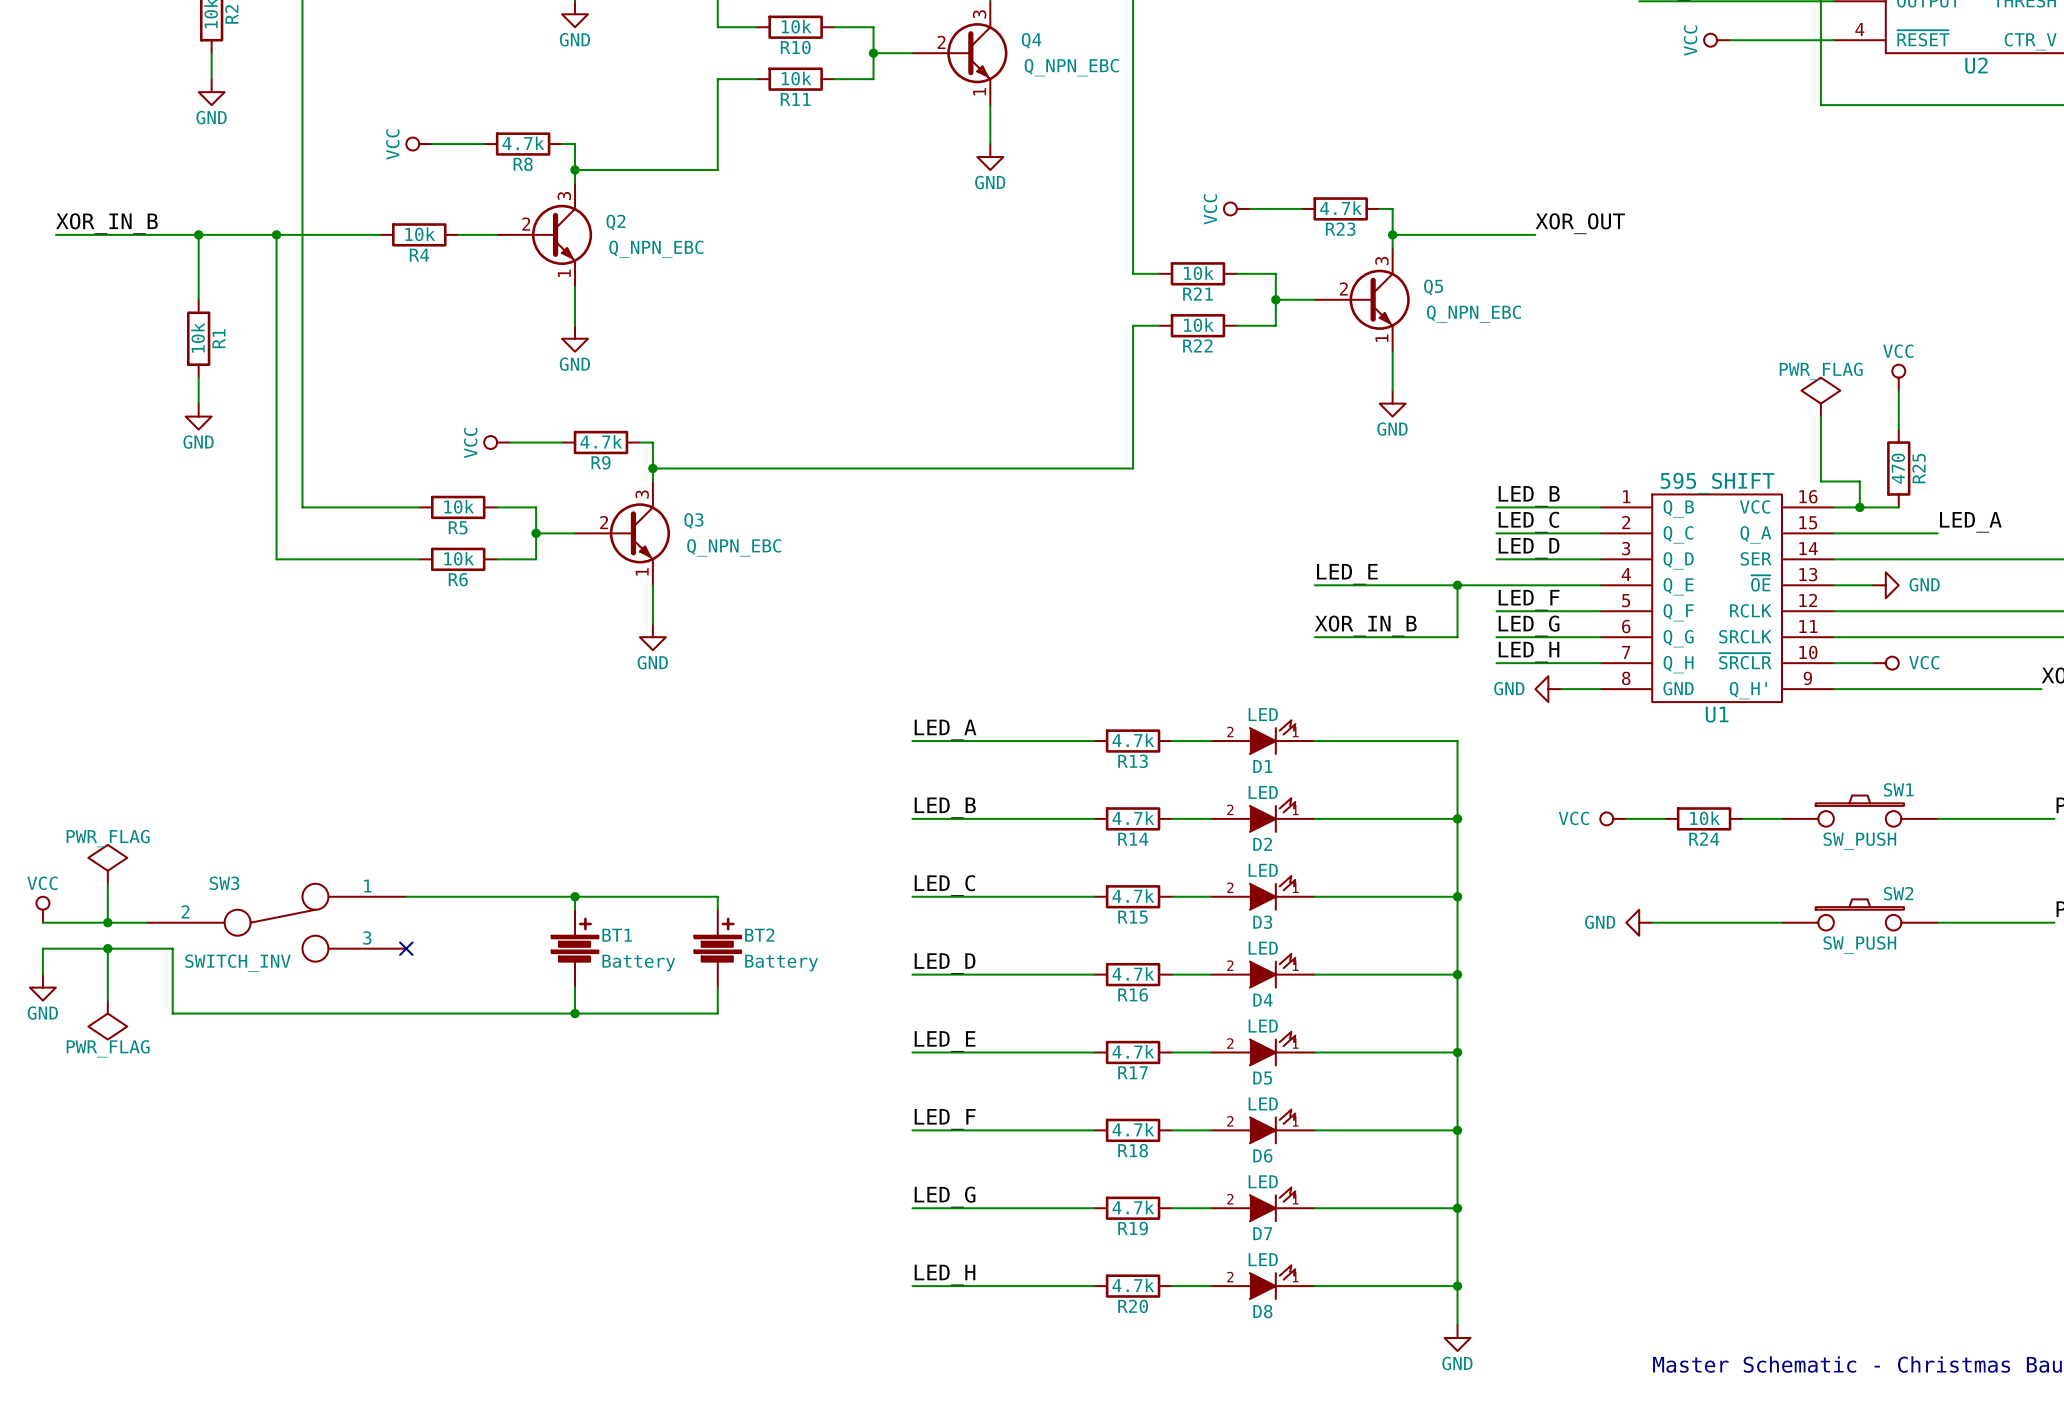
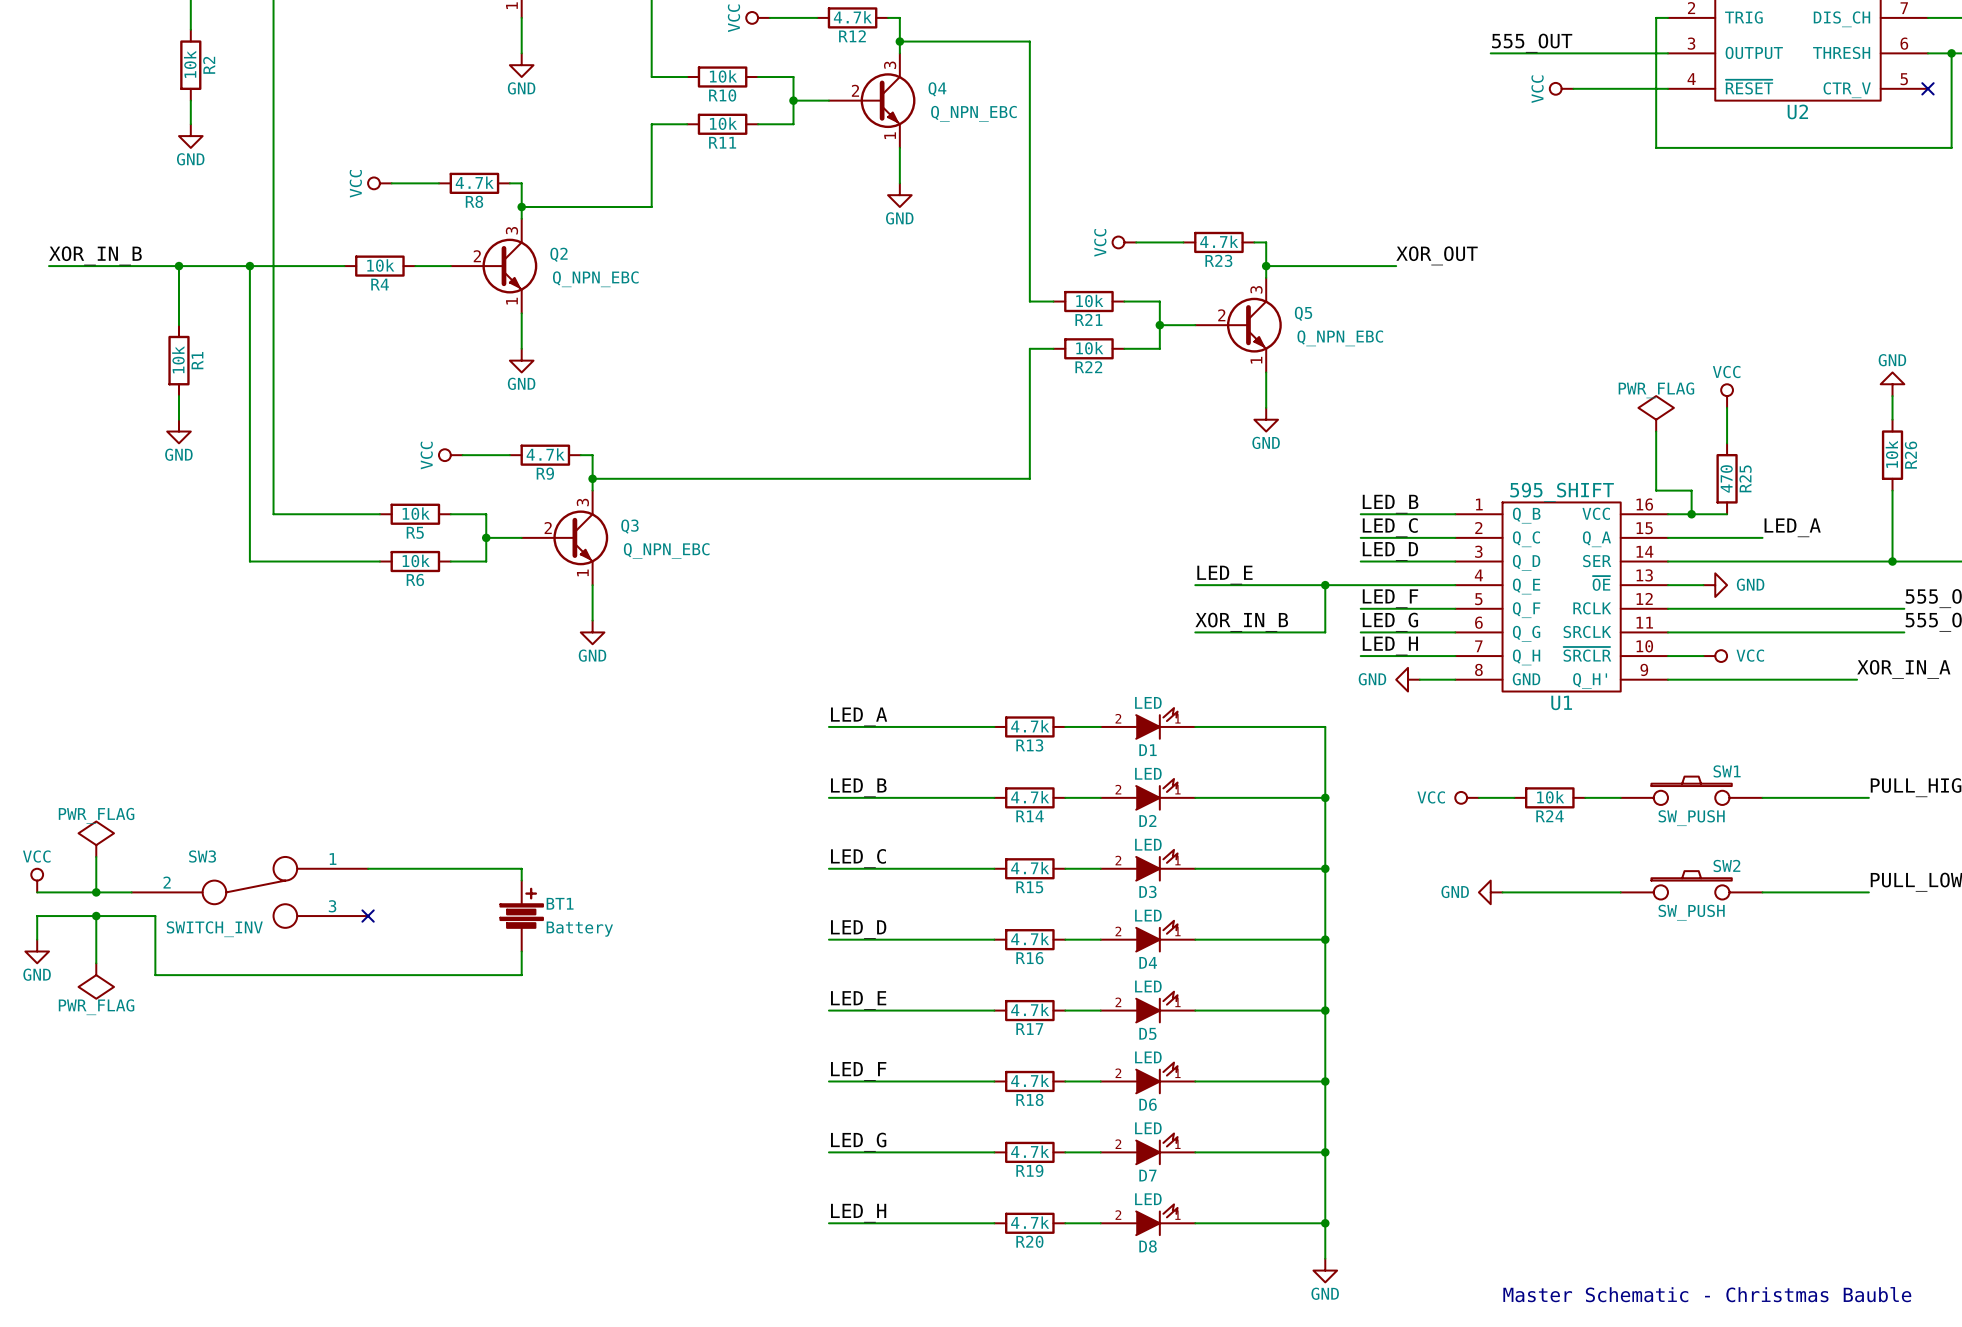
wire: (575, 896) (717, 896) (717, 909) -> none
junction: (575, 896) -> none
BT2: Battery (717, 948) -> none
wire: (717, 987) (717, 1013) (575, 1013) -> none
junction: (575, 1013) -> none

